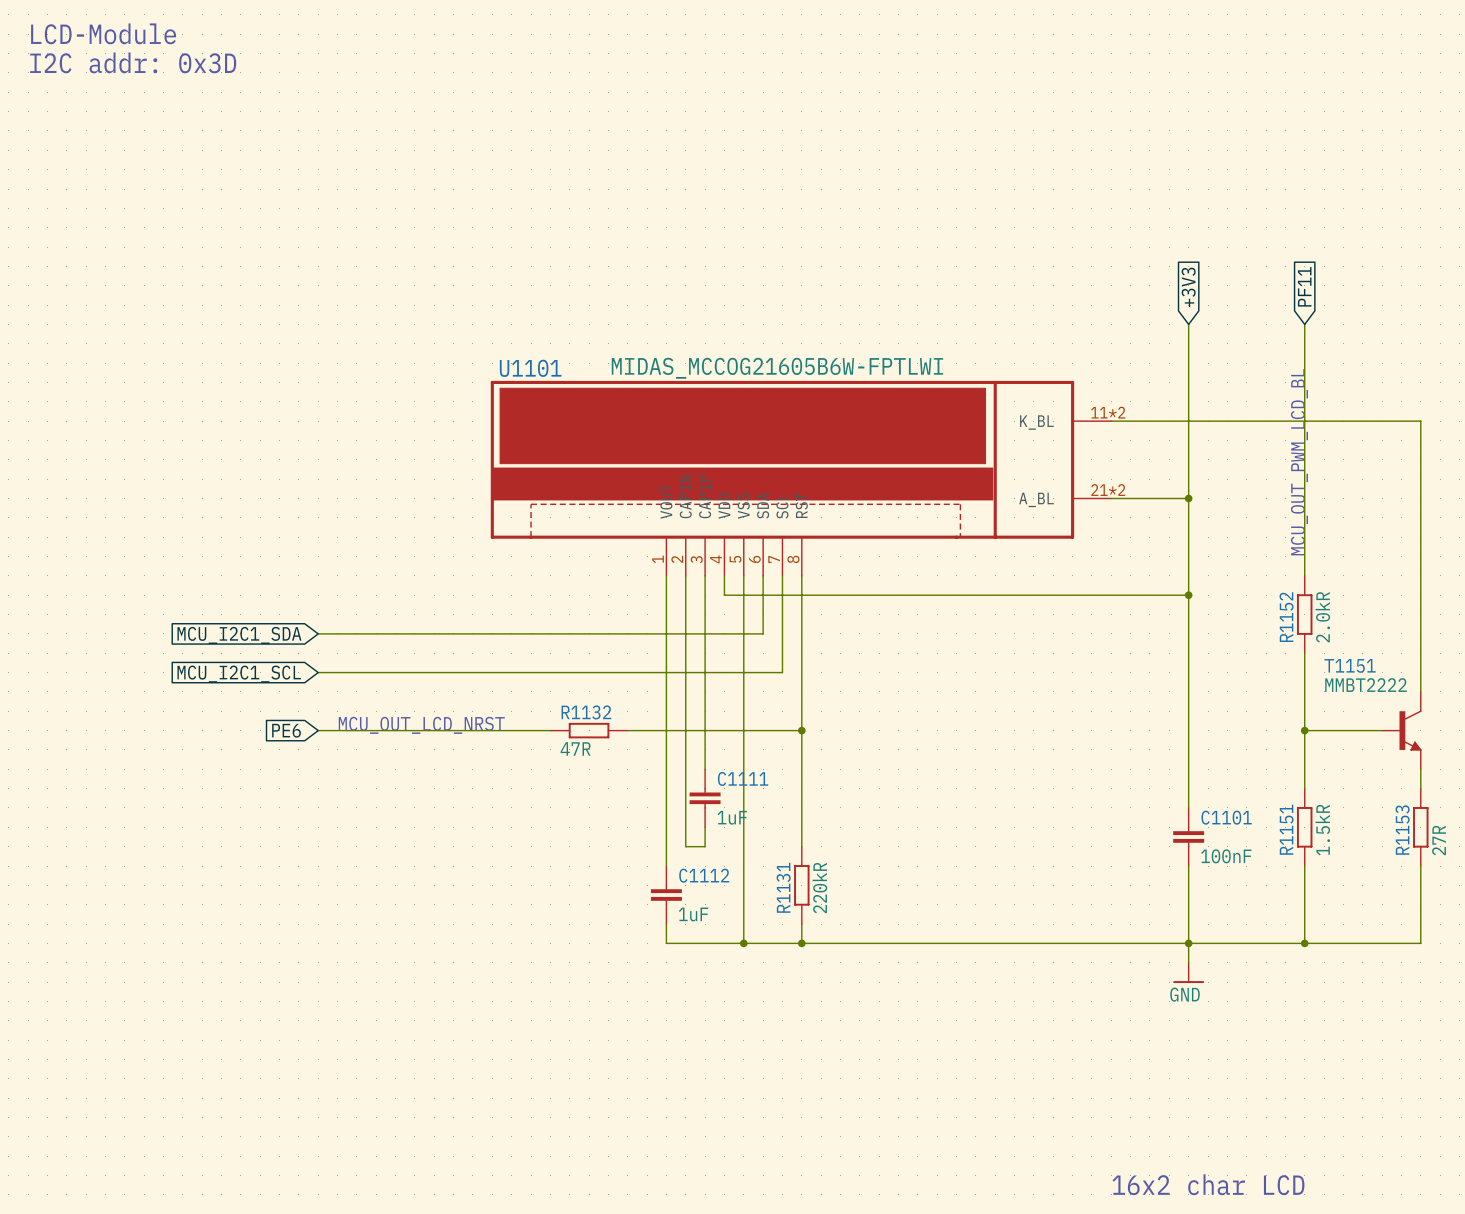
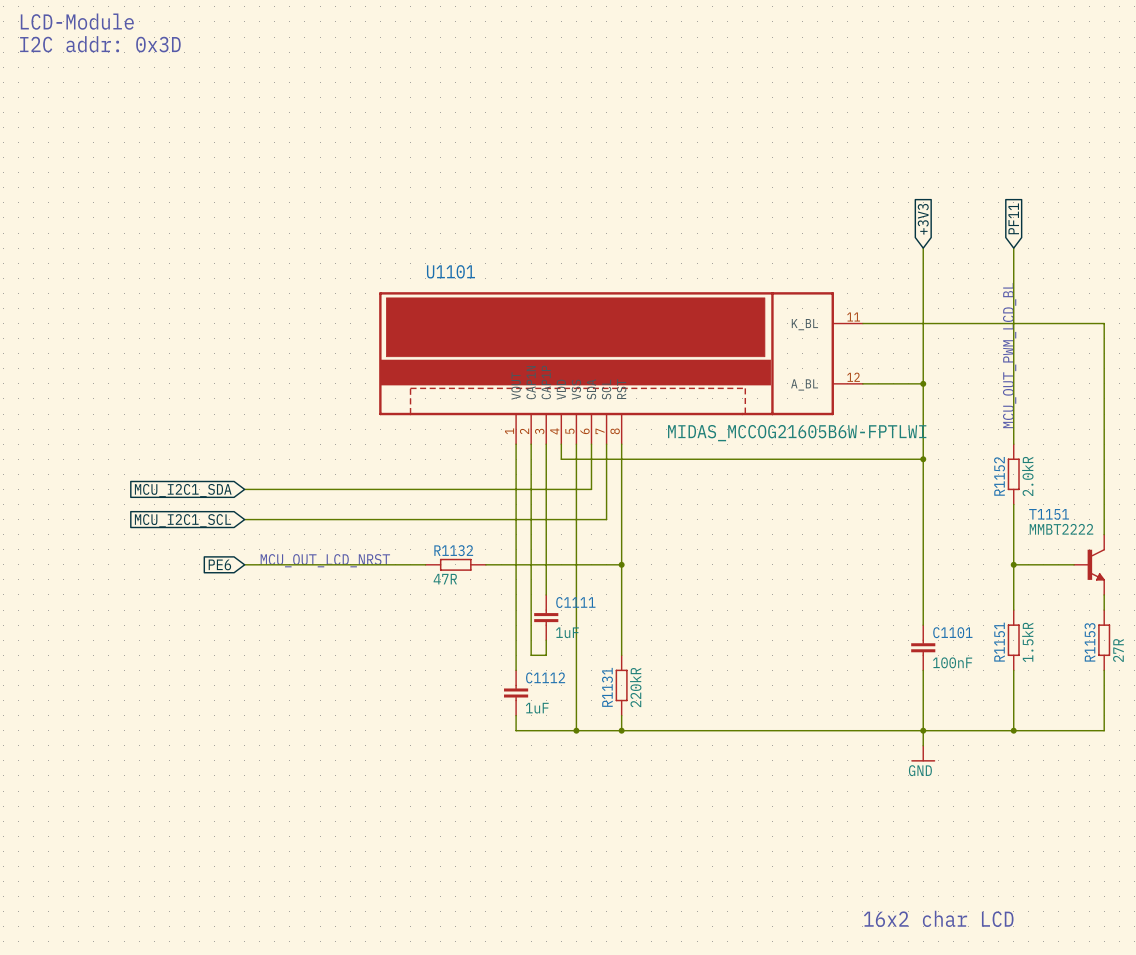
U1101 name position: U1101 (530, 368) -> U1101 (450, 271)
U1101 value position: MIDAS_MCCOG21605B6W-FPTLWI (777, 368) -> MIDAS_MCCOG21605B6W-FPTLWI (797, 433)
U1101 pin number: 11*2 (1108, 412) -> 11 (853, 317)
U1101 pin number: 21*2 (1108, 490) -> 12 (853, 377)

